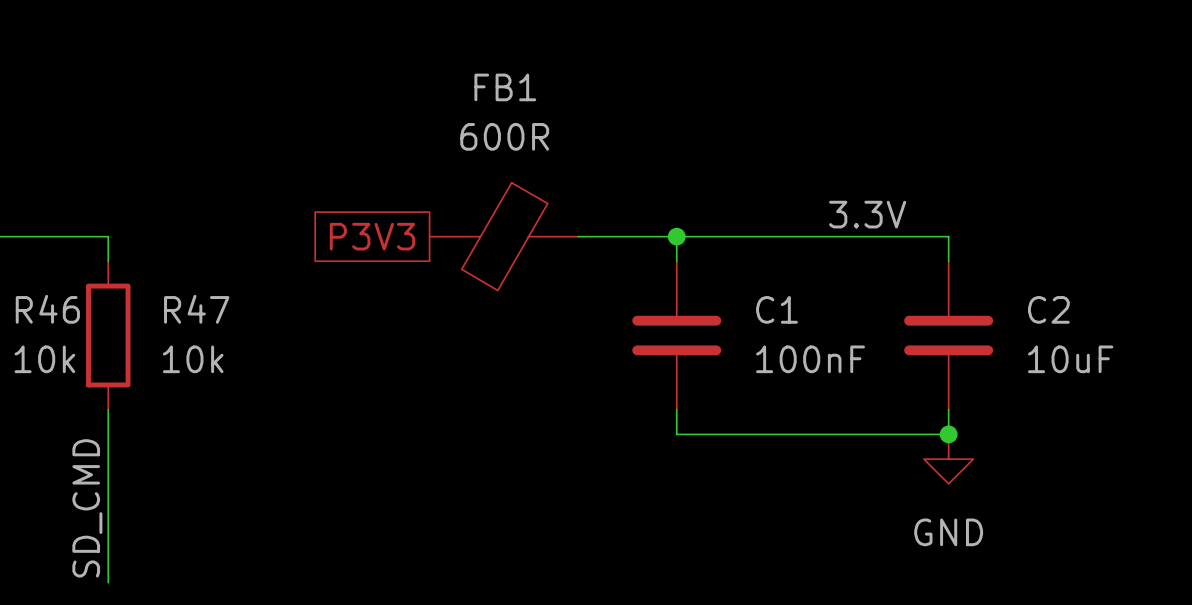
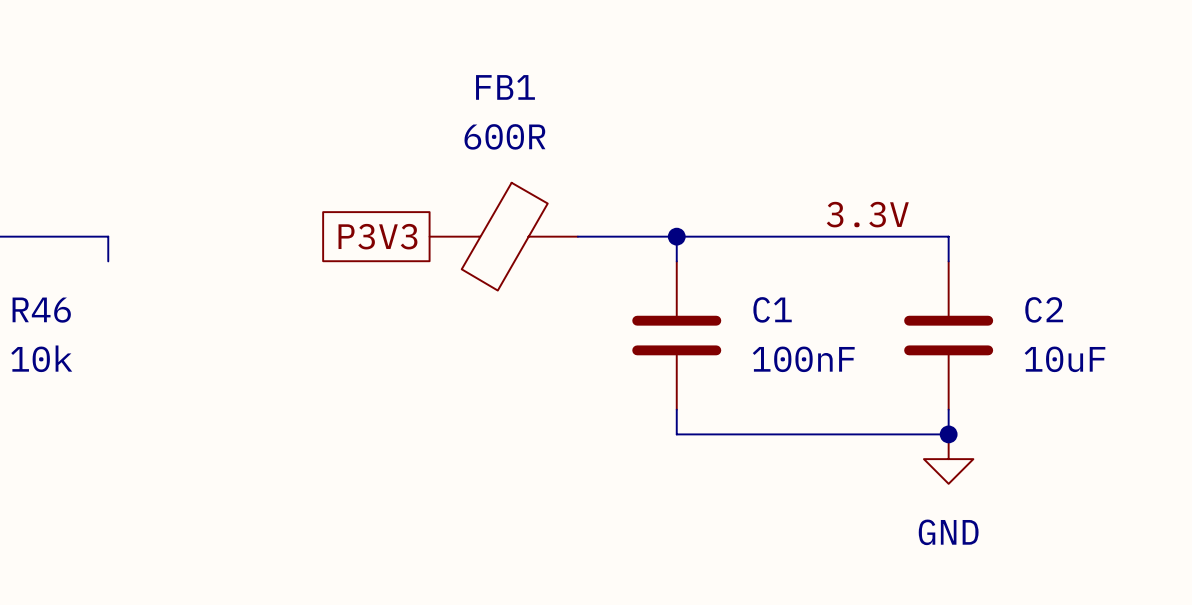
R47: 10k (108, 335) -> none
wire: (108, 409) (108, 582) -> none
label: SD_CMD (87, 508) -> none

